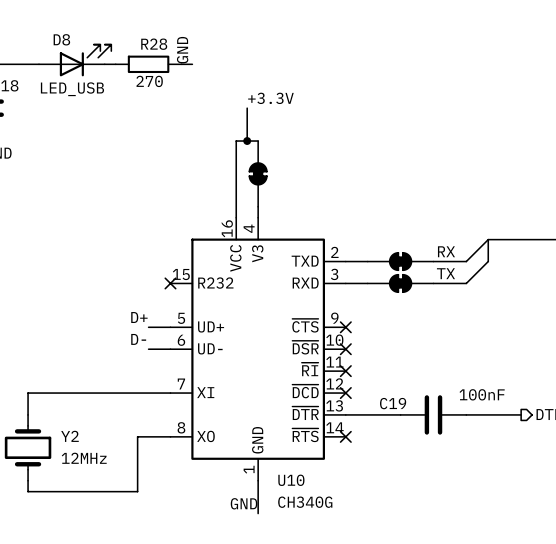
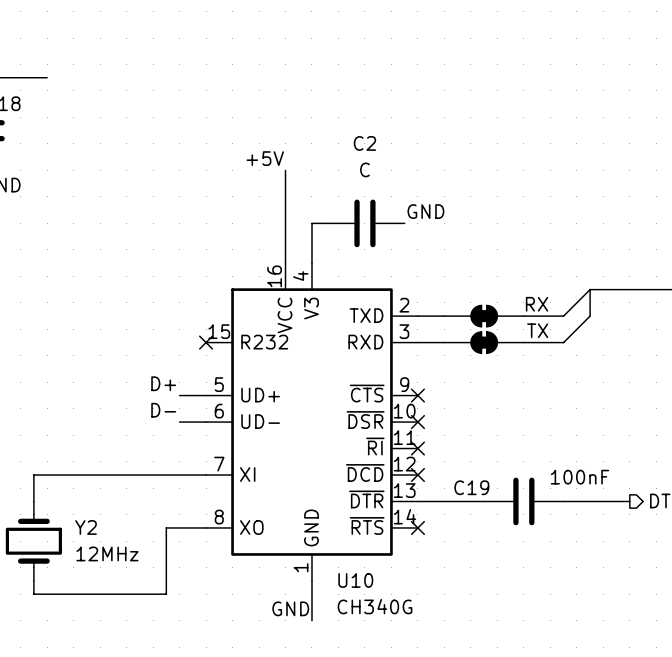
label rotation: 0° (182, 50) -> 90° clockwise (425, 211)
label position: GND (182, 50) -> GND (425, 211)
D8: LED_USB (75, 60) -> none
wire: (104, 64) (115, 64) -> none
R28: 270 (148, 64) -> none
wire: (181, 64) (192, 64) -> none
label: +3.3V (270, 98) -> none
wire: (247, 108) (247, 141) -> none
label: none -> +5V (265, 158)
wire: (236, 141) (258, 141) -> none
junction: (247, 141) -> none
part: (258, 173) -> none
C2: none -> C (364, 223)

